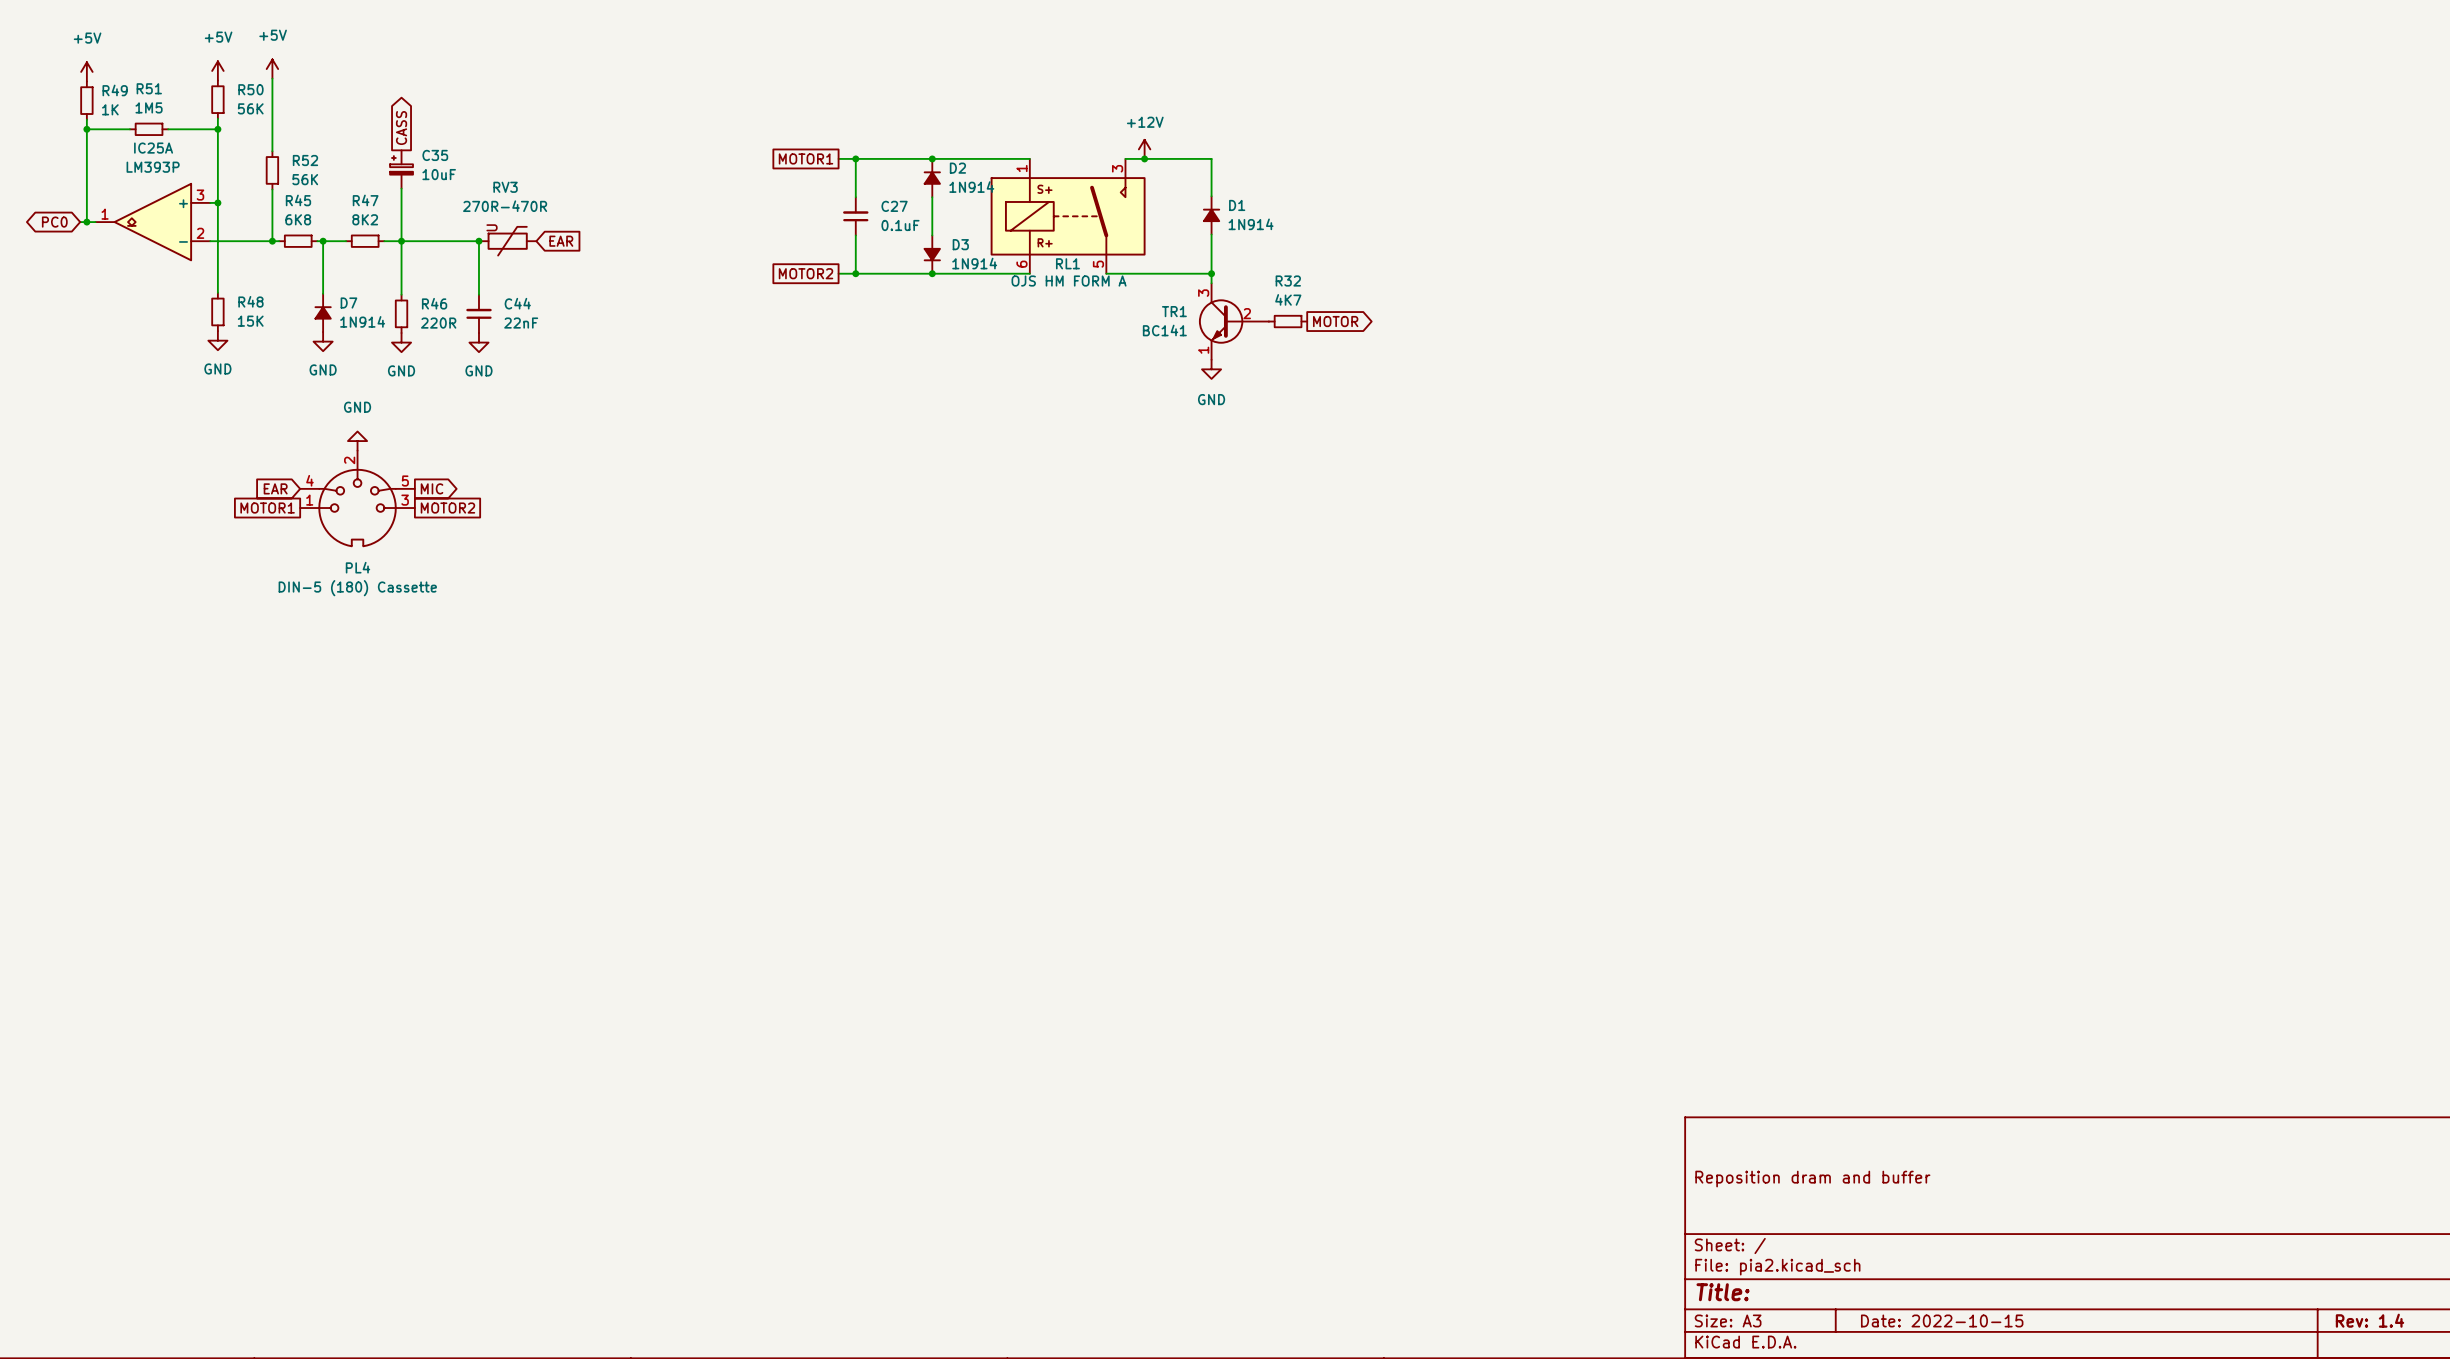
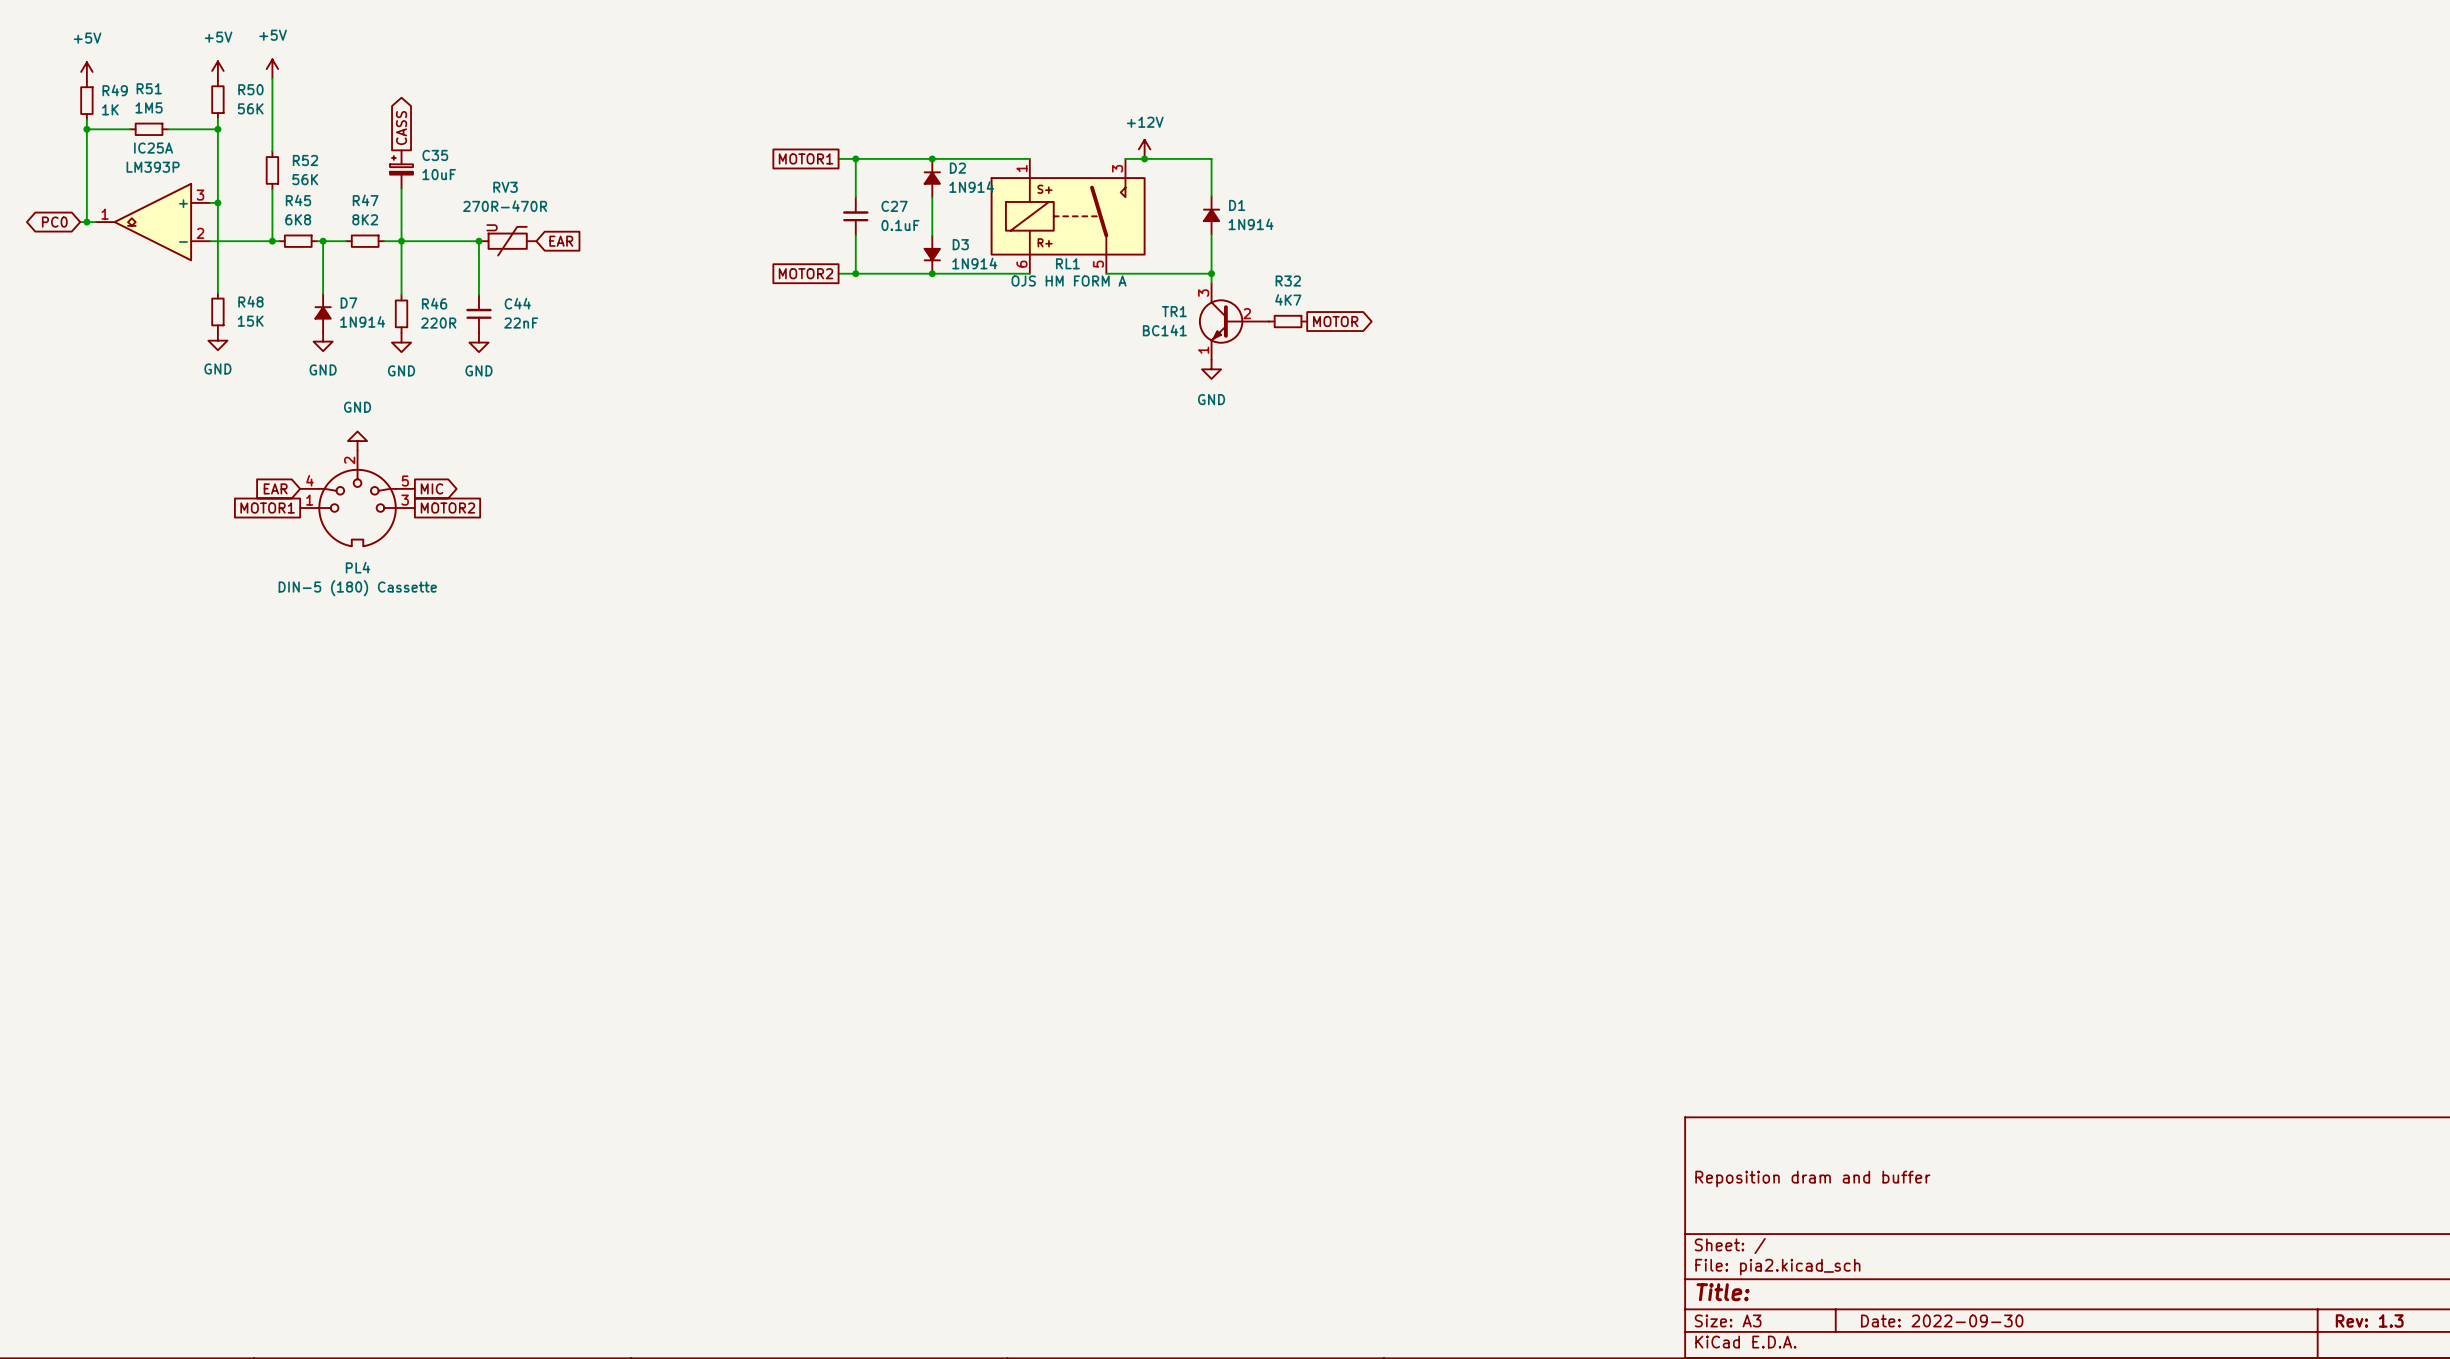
title block: Date: 2022-10-15 (1942, 1320) -> Date: 2022-09-30 (1942, 1320)
title block: Rev: 1.4 (2370, 1320) -> Rev: 1.3 (2369, 1320)

